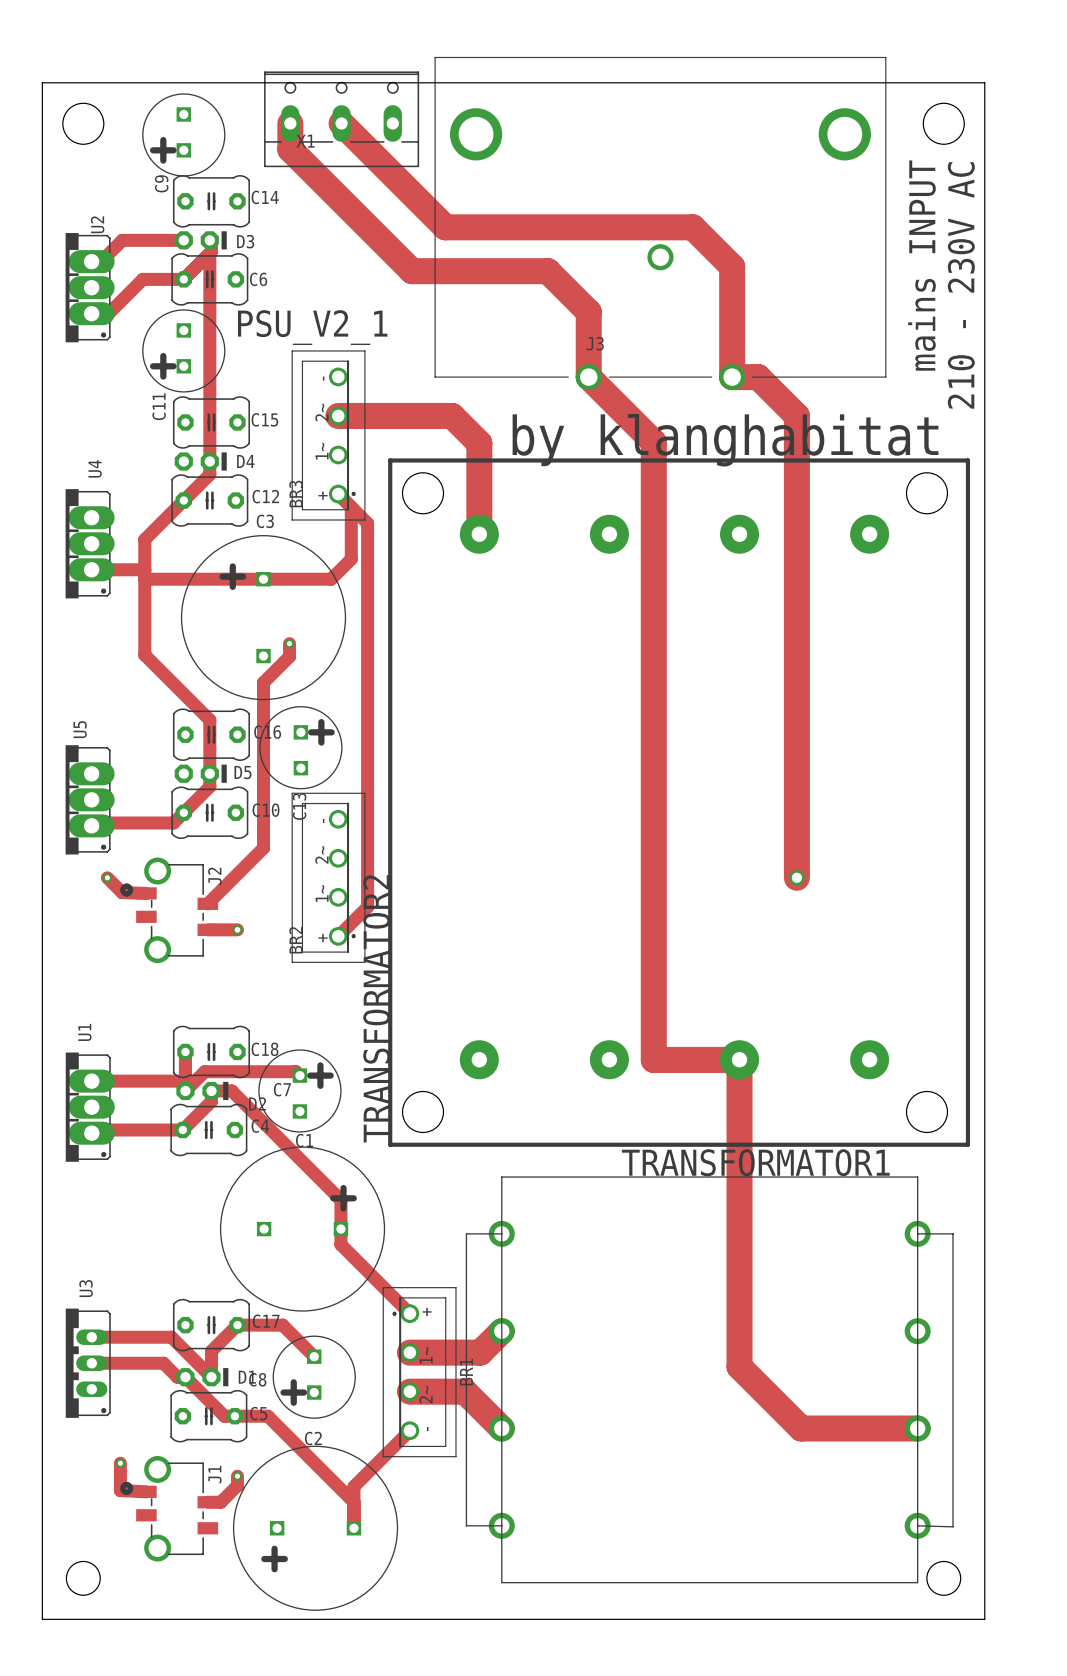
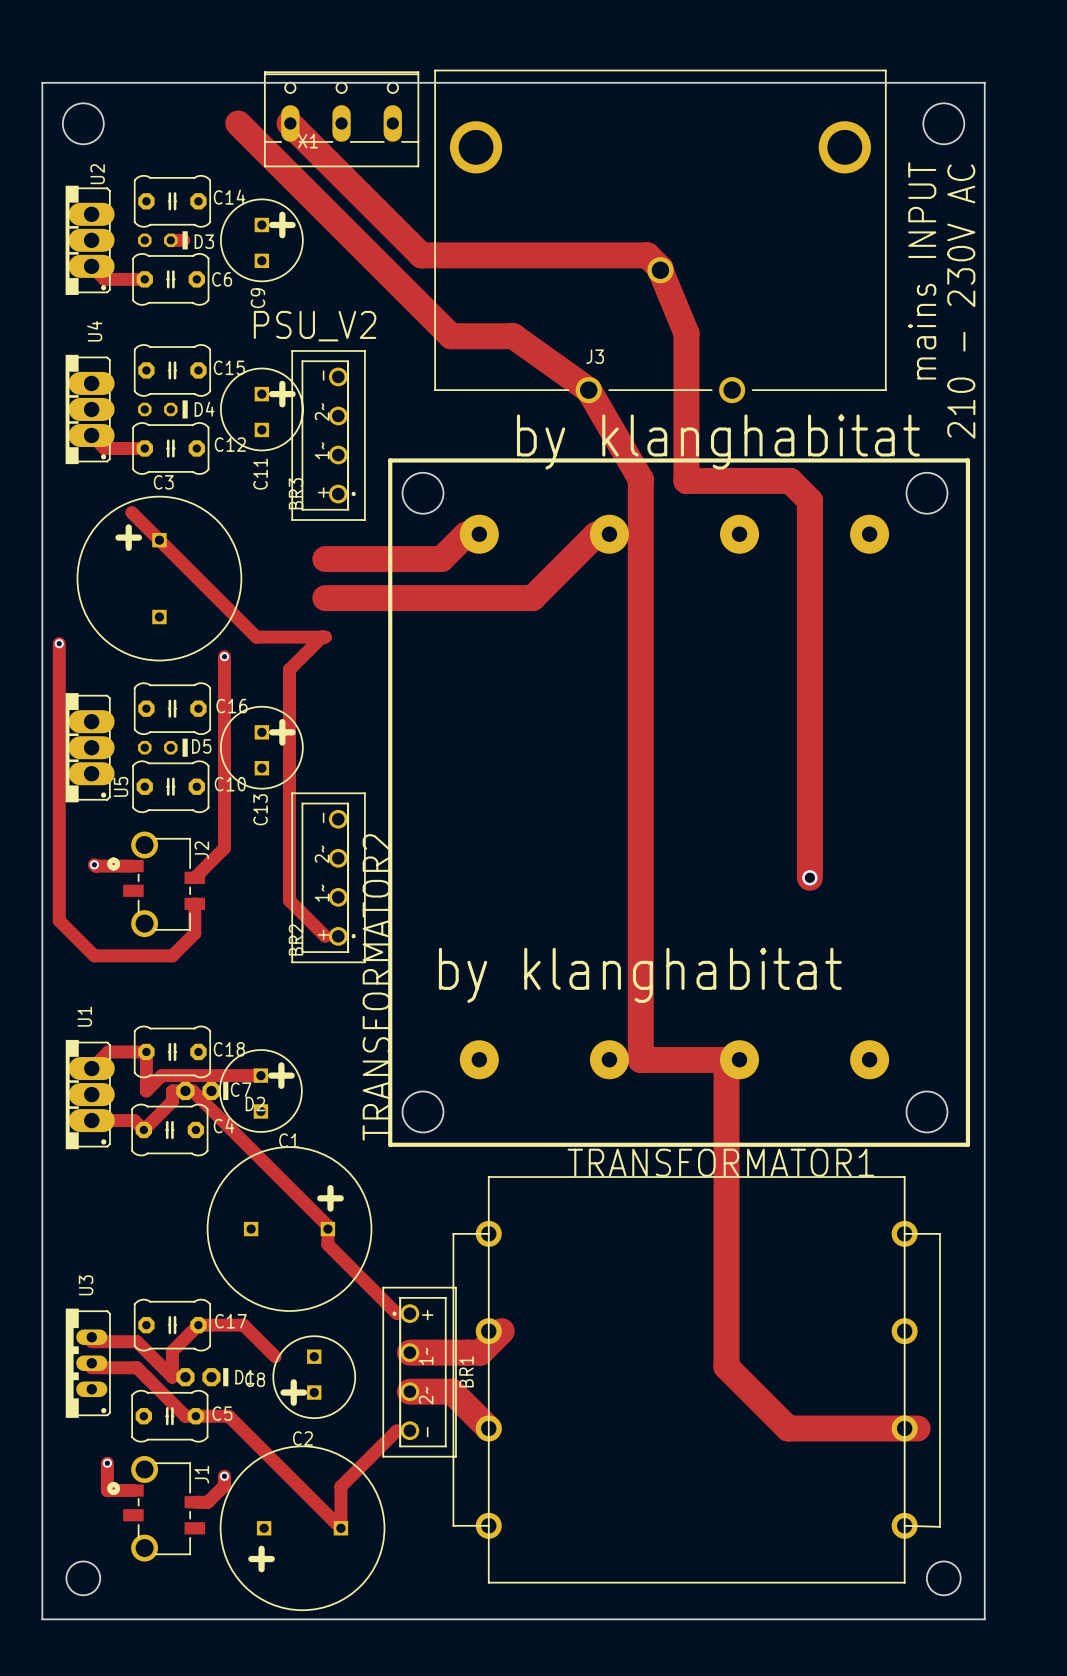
track: none -> (289, 123) (421, 255) (647, 255) (660, 268) (686, 333) (686, 480) (790, 480) (809, 500) (809, 877)
track: (290, 123) (290, 149) (412, 271) (547, 271) (588, 312) (588, 377) (653, 442) (653, 1059) -> (238, 123) (451, 336) (513, 336) (588, 390) (640, 479) (640, 1059) (653, 1059)
track: (341, 123) (445, 227) (692, 227) (732, 266) (732, 377) (758, 377) (796, 415) (796, 877) -> none
C9 rotation: 0° (183, 134) -> 180° (261, 240)
C9 position: (183, 134) -> (261, 240)
C9 name position: C9 (161, 183) -> C9 (257, 298)
C14 position: (211, 201) -> (172, 201)
J3 position: (660, 223) -> (660, 236)
D3 footprint: [174, 231, 227, 250] -> [138, 231, 188, 250]
track: (170, 240) (122, 240) (102, 260) (91, 261) -> none
track: (209, 240) (211, 240) (211, 251) (183, 279) (144, 279) -> none
track: (209, 253) (209, 474) (144, 539) (144, 655) (209, 720) (209, 786) (173, 823) (97, 823) (91, 825) -> none
track: (142, 279) (108, 313) (91, 313) -> (142, 279) (104, 279) (91, 266)
C6 position: (209, 279) -> (170, 279)
U2 position: (90, 287) -> (90, 240)
text: PSU_V2_1 (312, 327) -> PSU_V2 (315, 326)
C11 rotation: 0° (183, 350) -> 180° (261, 409)
C11 position: (183, 350) -> (261, 409)
C11 name position: C11 (159, 406) -> C11 (260, 474)
track: (338, 415) (452, 415) (479, 443) (479, 534) -> none
C15 position: (211, 422) -> (172, 370)
track: none -> (91, 435) (104, 448) (144, 448)
D4 footprint: [174, 452, 227, 471] -> [138, 400, 188, 419]
track: (338, 494) (367, 523) (367, 907) (338, 936) -> none
C12 position: (209, 500) -> (170, 448)
track: (351, 507) (351, 559) (331, 579) (144, 579) -> none
track: none -> (131, 512) (256, 637) (325, 637)
track: none -> (466, 534) (441, 559) (325, 559)
track: none -> (596, 534) (532, 598) (325, 598)
U4 position: (90, 543) -> (90, 409)
track: (91, 569) (144, 569) -> none
C3 position: (263, 617) -> (159, 578)
track: none -> (322, 637) (289, 669) (289, 900) (325, 936)
track: none -> (59, 643) (59, 920) (94, 955) (172, 955) (194, 933) (194, 903)
via: none -> (59, 643)
track: (289, 643) (289, 656) (263, 682) (263, 848) (207, 903) -> none
via: (289, 643) -> none
track: none -> (224, 656) (224, 848) (194, 877)
via: none -> (224, 656)
U5 name position: U5 (80, 729) -> U5 (121, 786)
C16 position: (211, 734) -> (172, 708)
C13 position: (300, 747) -> (261, 747)
D5 footprint: [174, 764, 227, 783] -> [138, 738, 188, 757]
U5 position: (90, 799) -> (90, 747)
C10 position: (209, 812) -> (170, 786)
J2 footprint: [120, 857, 219, 964] -> [107, 831, 206, 938]
track: none -> (94, 864) (133, 866)
track: (107, 877) (122, 892) (146, 893) -> none
via position: (107, 877) -> (94, 864)
via position: (796, 877) -> (809, 877)
track: (207, 929) (237, 929) -> none
via: (237, 929) -> none
text: none -> by klanghabitat (640, 975)
track: (185, 1051) (185, 1090) (204, 1071) (296, 1071) (299, 1075) -> none
C18 position: (211, 1051) -> (172, 1051)
track: (726, 1059) (739, 1059) (739, 1366) (801, 1428) -> (726, 1059) (726, 1366) (788, 1428) (801, 1428)
track: none -> (91, 1068) (108, 1051) (146, 1051) (146, 1090) (161, 1075) (260, 1075)
track: (91, 1081) (185, 1081) -> none
C7 position: (299, 1090) -> (260, 1090)
U1 position: (90, 1107) -> (90, 1094)
track: none -> (91, 1120) (134, 1120) (143, 1130) (172, 1101) (172, 1090) (192, 1090) (327, 1226) (327, 1244) (396, 1313)
C4 position: (208, 1130) -> (169, 1130)
track: (91, 1133) (100, 1130) (182, 1130) (211, 1101) (211, 1090) (231, 1090) (340, 1200) (340, 1244) (409, 1313) -> none
C1 position: (302, 1229) -> (289, 1229)
C17 position: (211, 1325) -> (172, 1325)
track: (237, 1325) (211, 1351) (211, 1377) (171, 1337) (91, 1337) -> (237, 1325) (198, 1325) (172, 1351) (172, 1377) (137, 1341) (91, 1341)
track: (243, 1325) (282, 1325) (314, 1356) -> (243, 1325) (275, 1356)
track: (91, 1363) (163, 1363) (177, 1377) (185, 1377) (224, 1416) -> (91, 1367) (137, 1367) (185, 1416) (224, 1416)
TRANSFORMATOR1 position: (709, 1379) -> (696, 1379)
track: (451, 1391) (464, 1391) (501, 1428) -> (451, 1391) (488, 1428)
C5 position: (208, 1416) -> (169, 1416)
track: (228, 1416) (267, 1416) (353, 1502) -> (228, 1416) (340, 1528) (340, 1486) (396, 1430)
track: (409, 1430) (353, 1486) (353, 1528) -> none
J1 footprint: [120, 1456, 219, 1562] -> [107, 1456, 206, 1562]
track: none -> (107, 1463) (107, 1490) (133, 1490)
track: (120, 1463) (120, 1490) (146, 1491) -> none
via position: (120, 1463) -> (107, 1463)
track: (237, 1476) (237, 1485) (220, 1502) (207, 1502) -> (224, 1476) (224, 1485) (207, 1502) (194, 1502)
via position: (237, 1476) -> (224, 1476)
C2 position: (315, 1528) -> (302, 1528)

